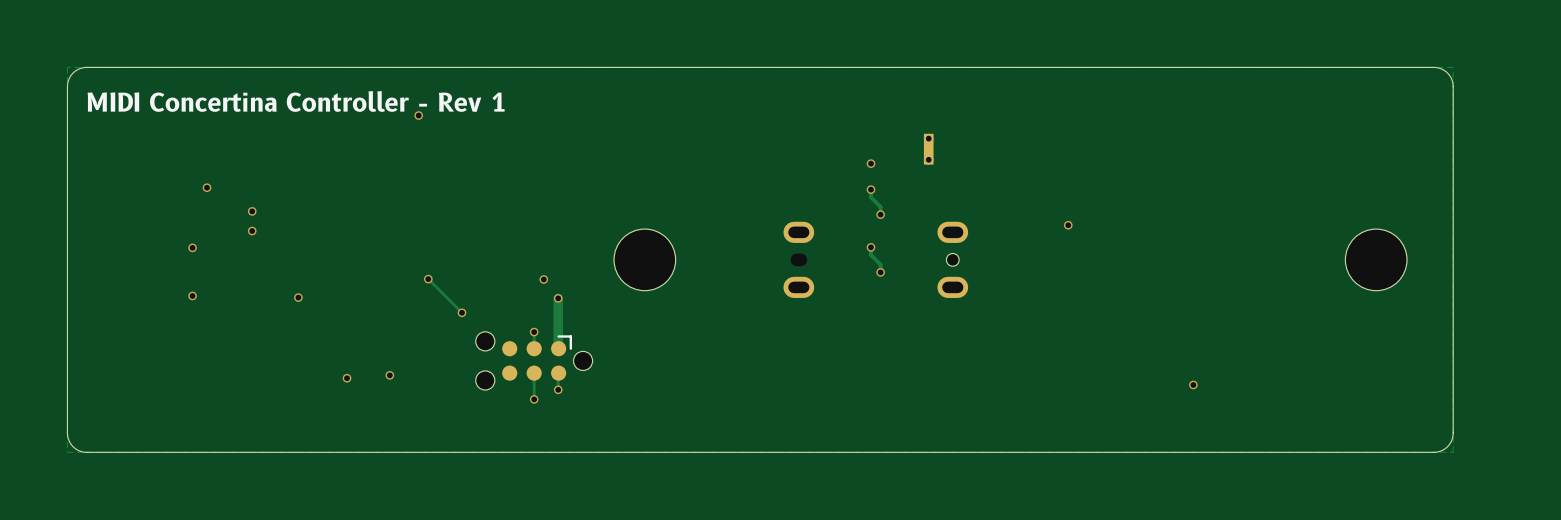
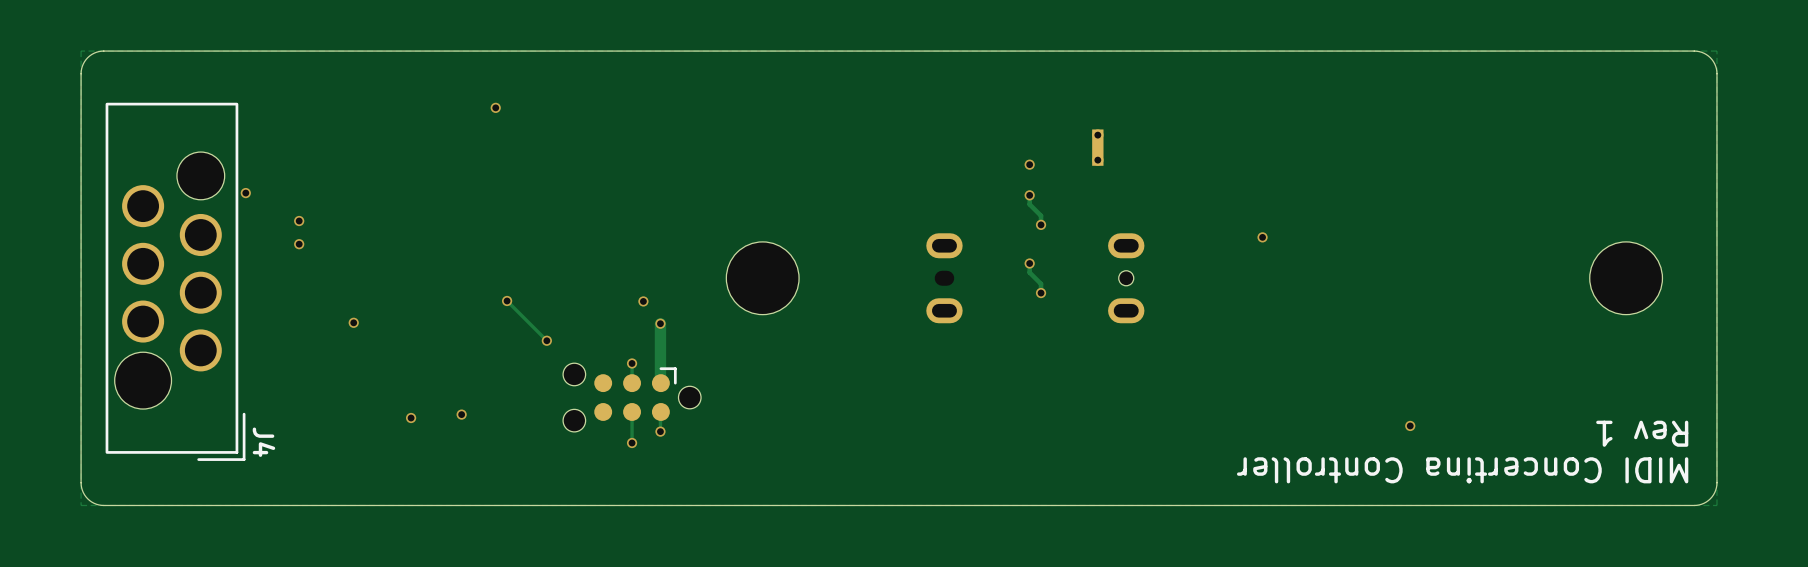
text: MIDI Concertina Controller - Rev 1 (296, 101) -> none
via: (192, 247) -> none
J4: none -> (175, 281)
via: (192, 295) -> none
text: none -> Rev 1 (1642, 433)
text: none -> MIDI Concertina Controller (1462, 470)

